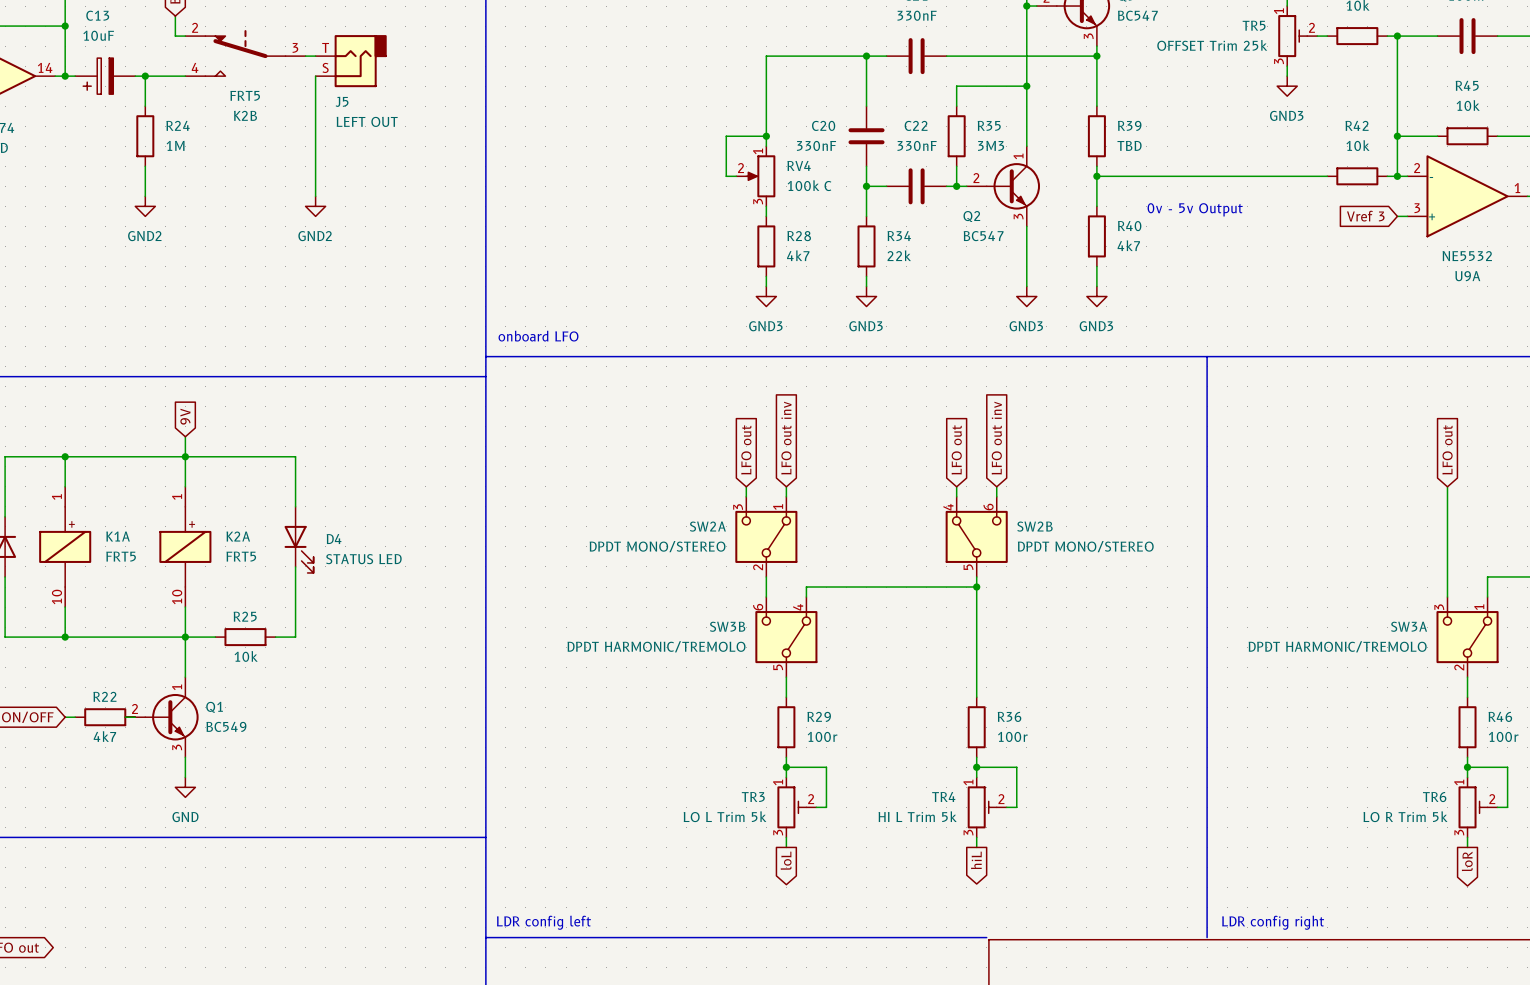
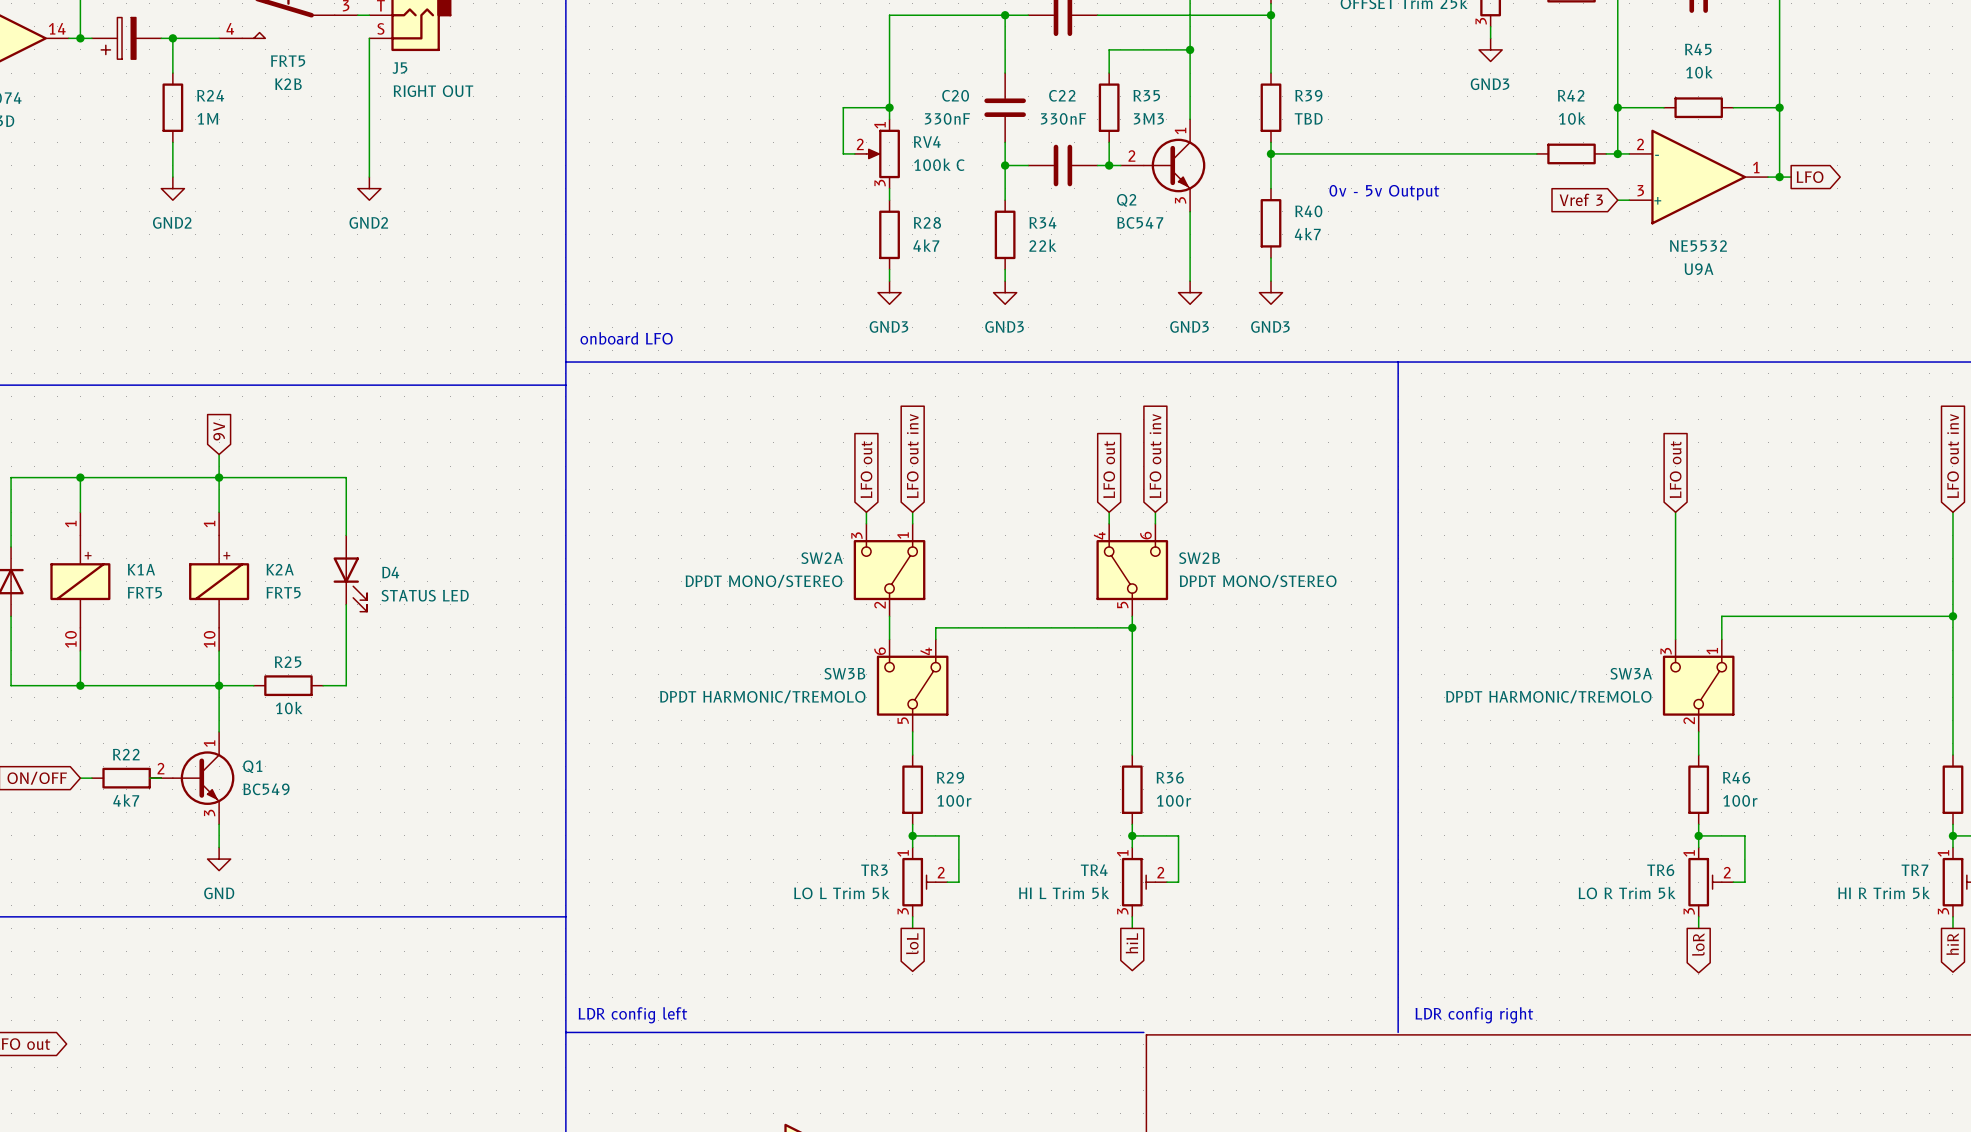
J5 value: LEFT OUT (367, 121) -> RIGHT OUT (433, 91)

